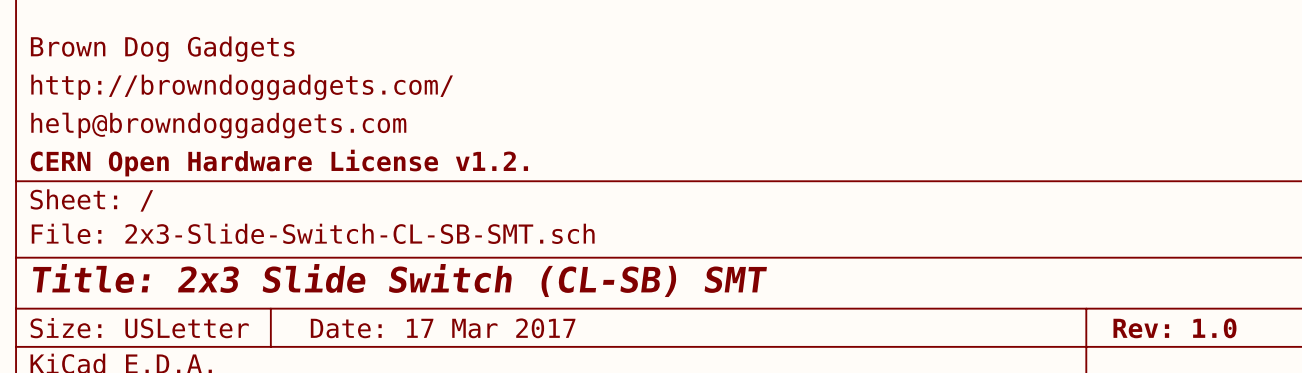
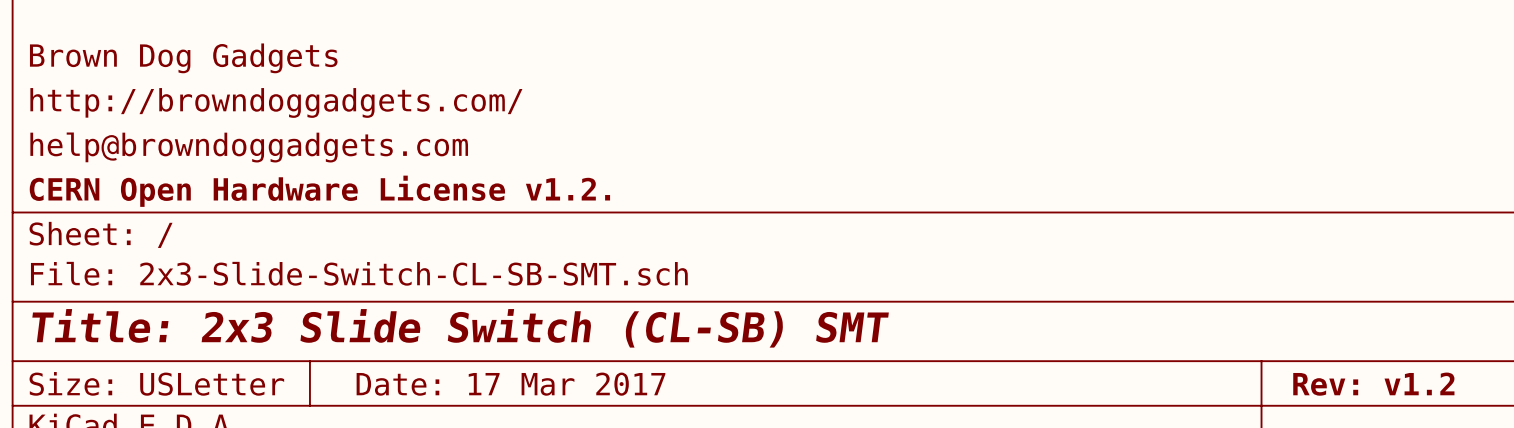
title block: Rev: 1.0 (1174, 328) -> Rev: v1.2 (1373, 384)

